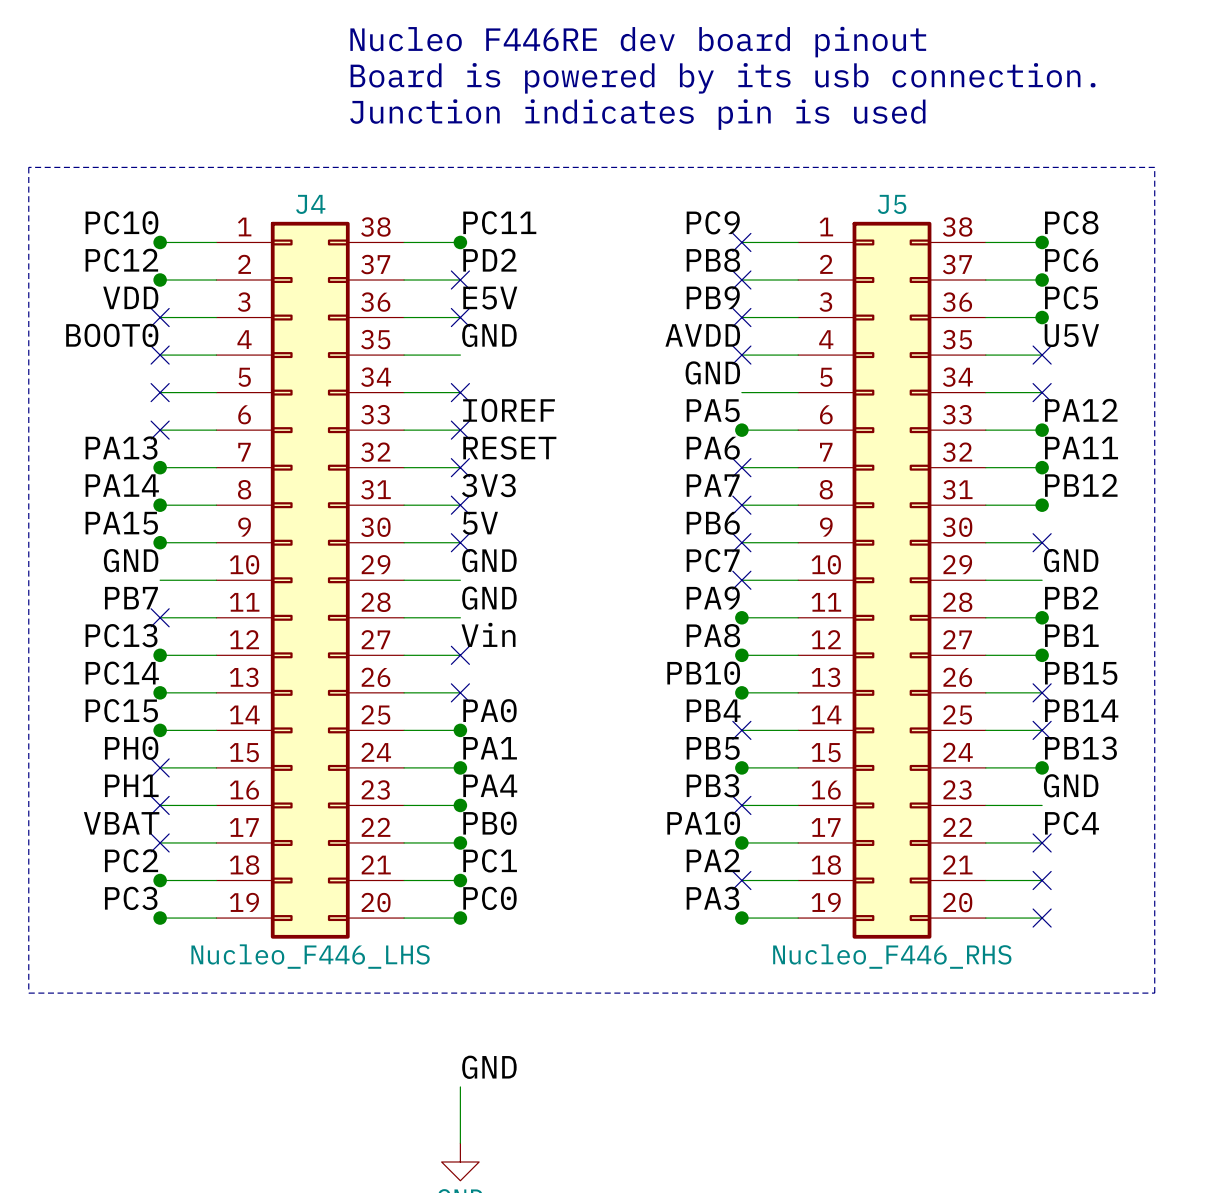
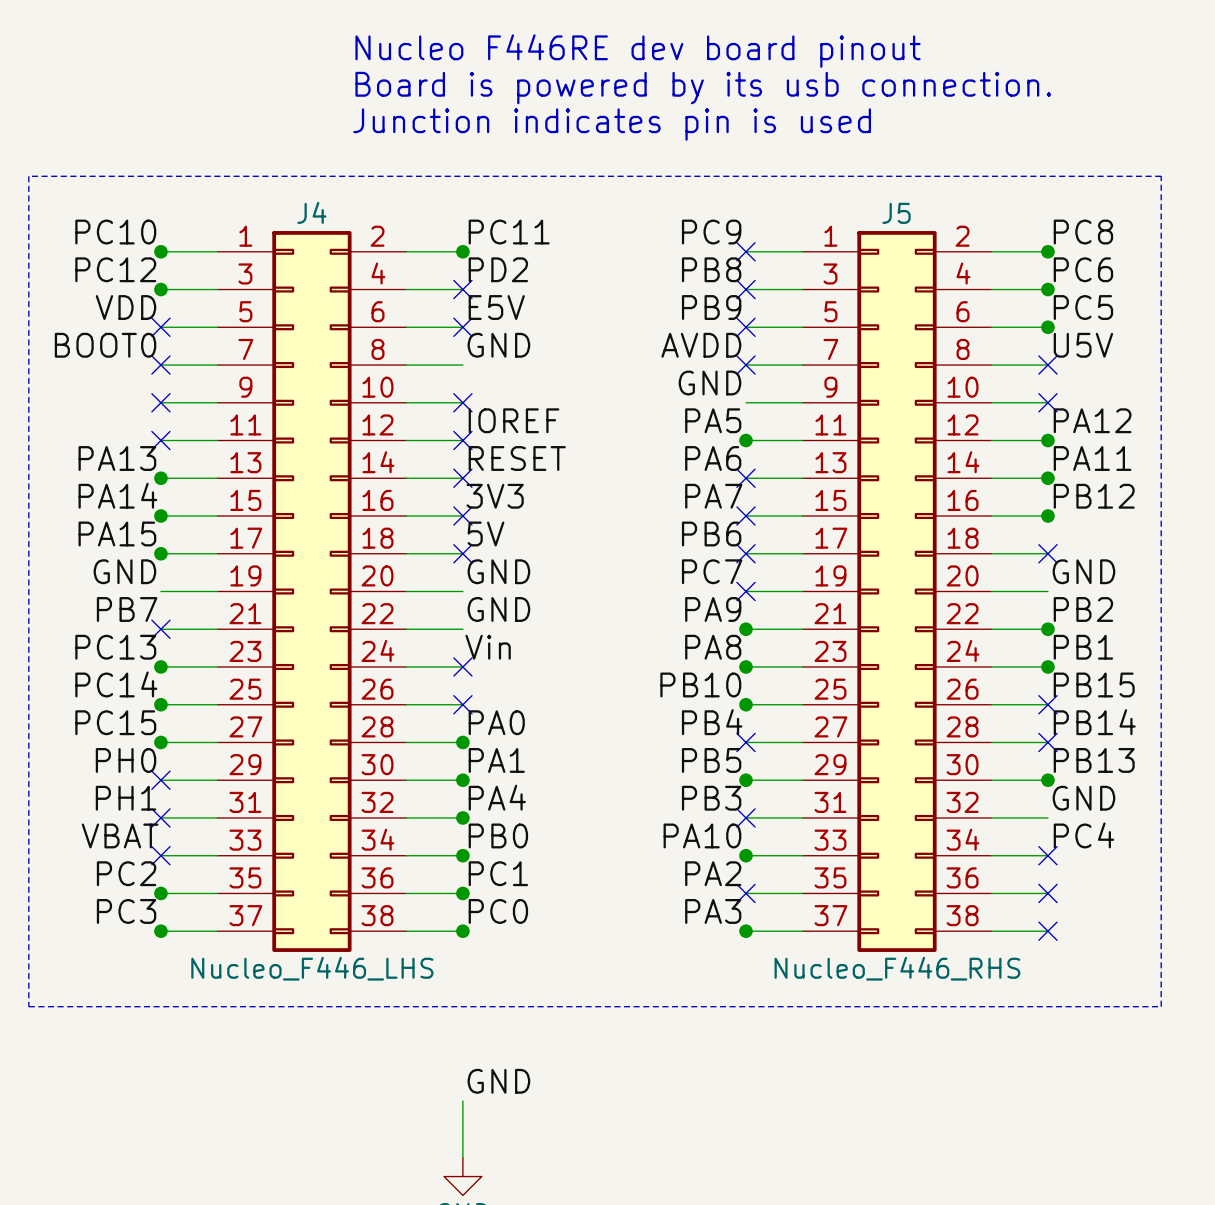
J4 symbol: [216, 221, 405, 939] -> [217, 231, 407, 952]
J5 symbol: [798, 221, 986, 939] -> [802, 231, 992, 952]

